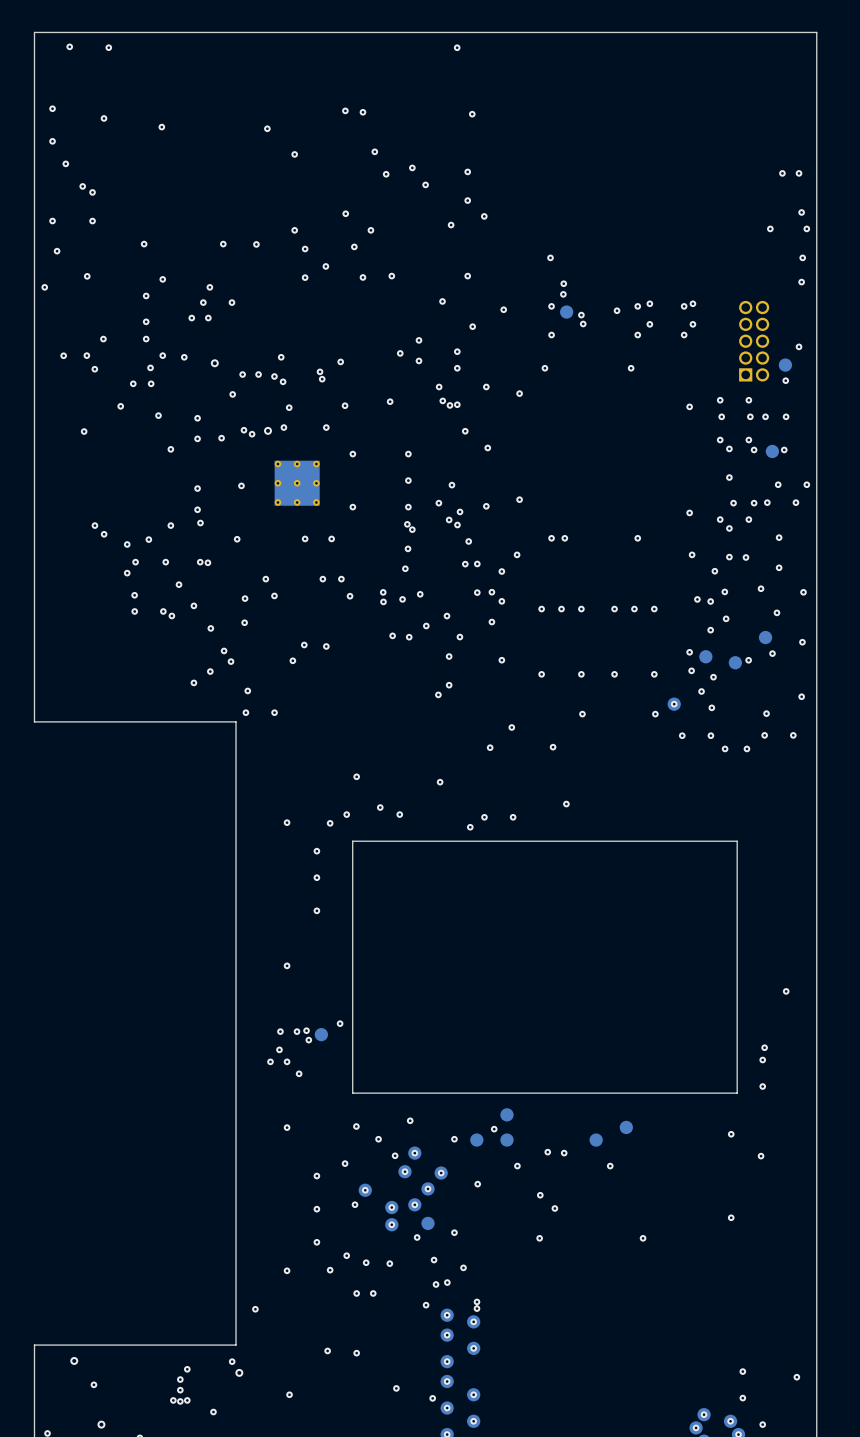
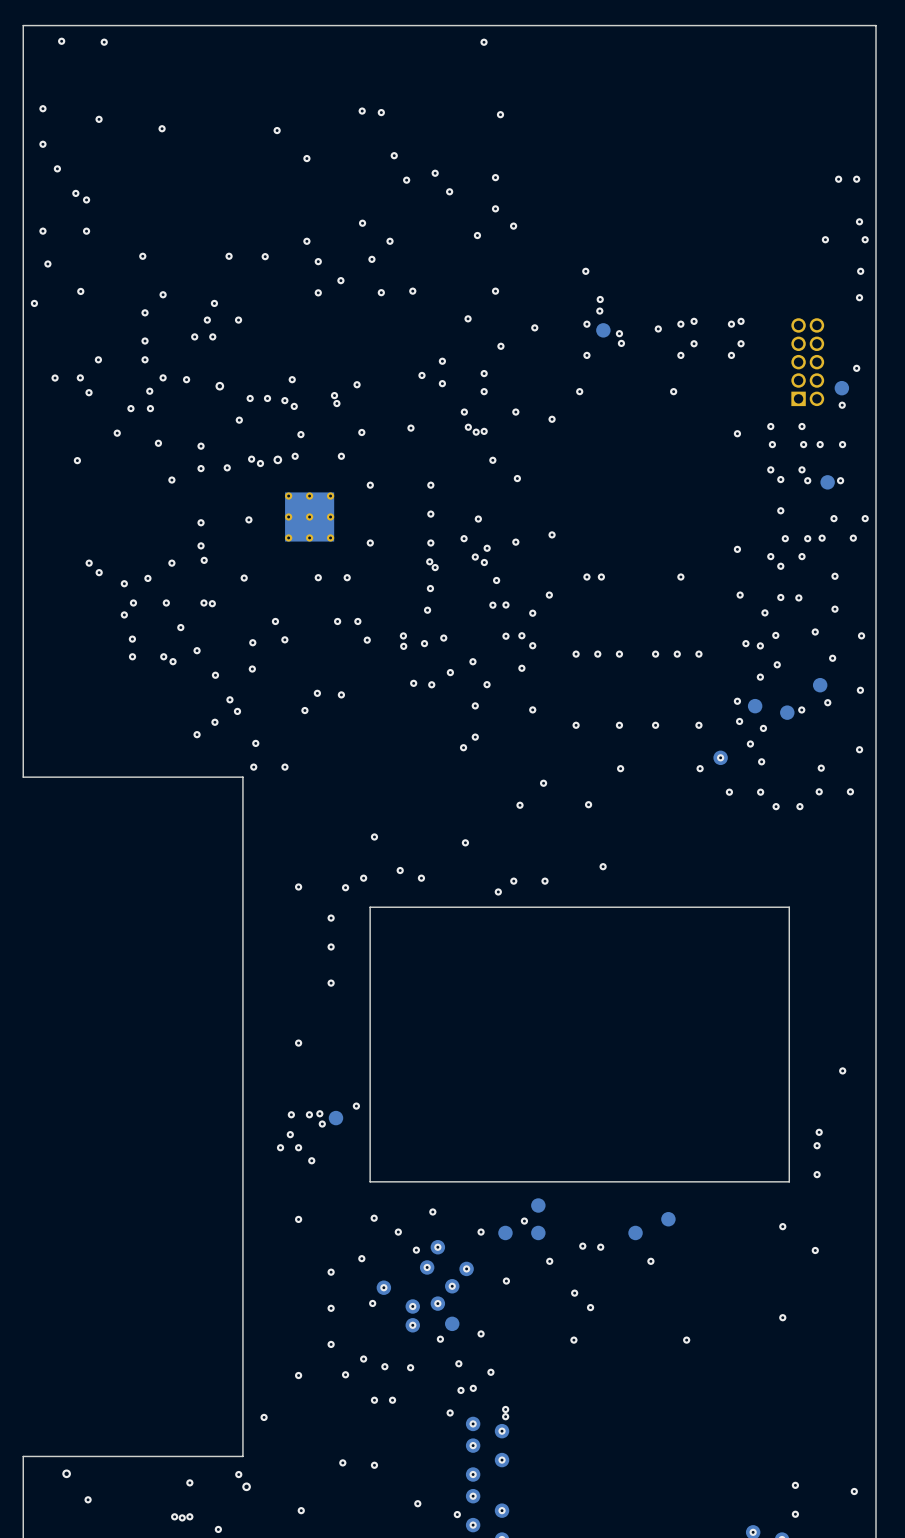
via: (180, 1379) -> none
via: (180, 1390) -> none

